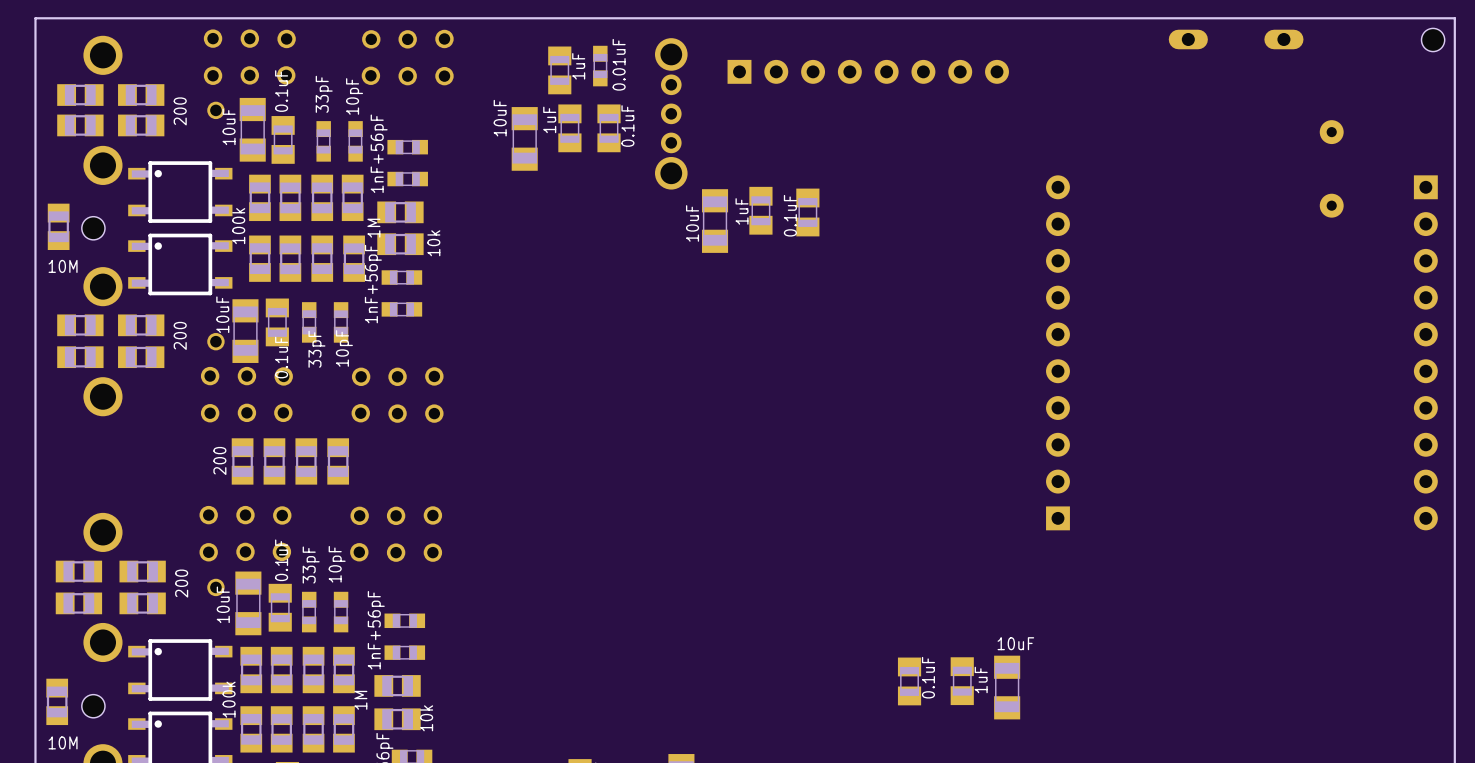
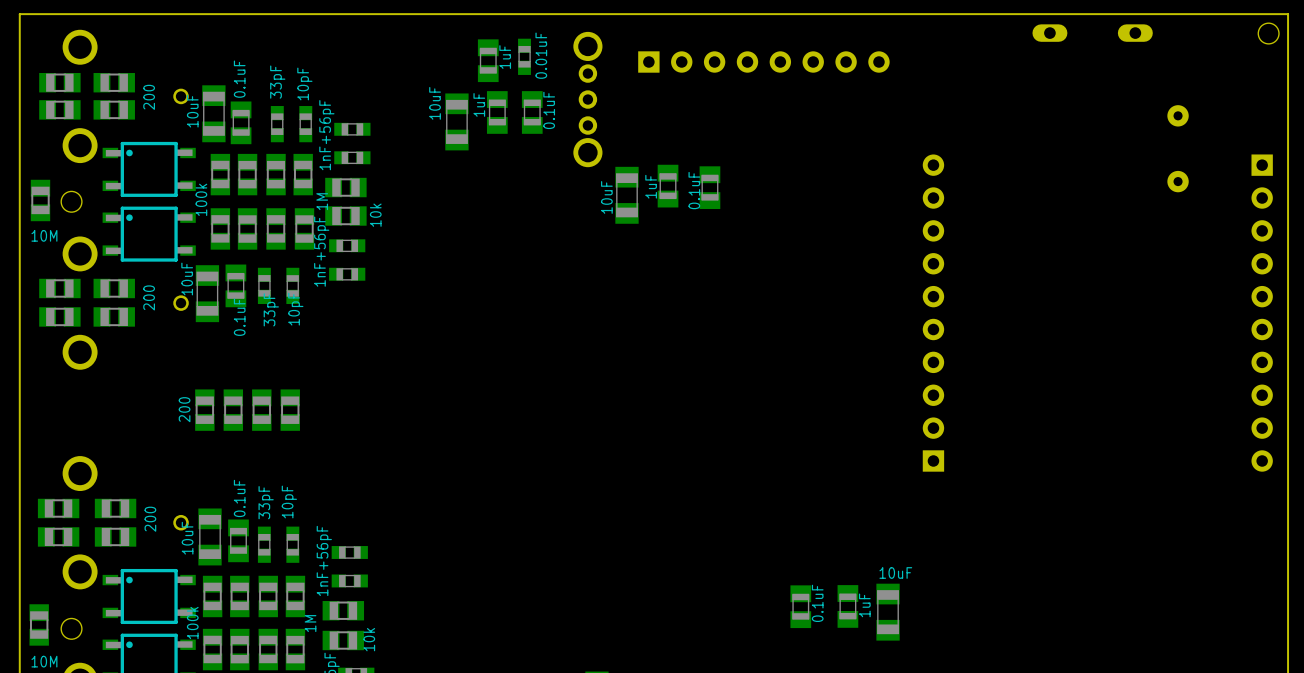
part: (249, 57) -> none
part: (407, 57) -> none
part: (246, 394) -> none
part: (397, 395) -> none
part: (245, 533) -> none
part: (396, 534) -> none

